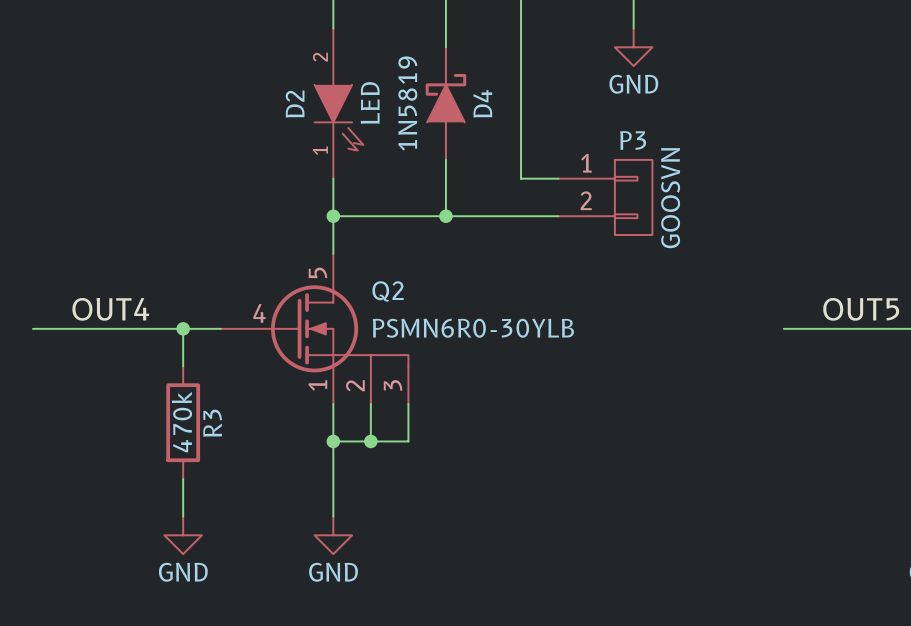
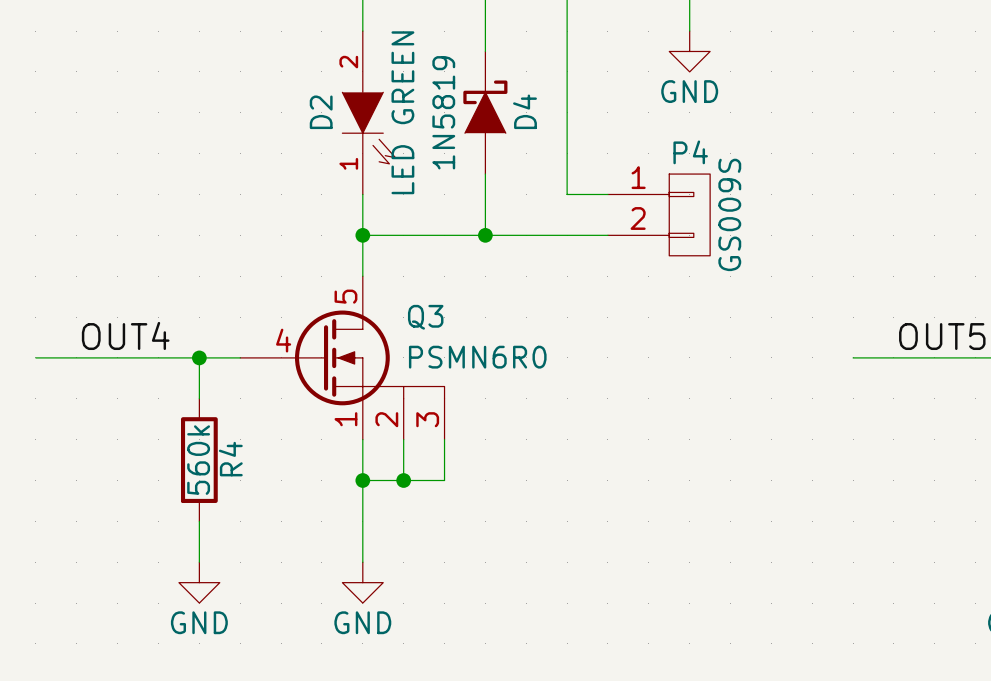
D2 value: LED (370, 102) -> LED GREEN (402, 112)
P3 name: P3 (633, 140) -> P4 (690, 152)
P3 value: GOOSVN (670, 198) -> GS009S (729, 214)
Q2 name: Q2 (388, 291) -> Q3 (425, 317)
Q2 value: PSMN6R0-30YLB (473, 328) -> PSMN6R0 (477, 357)
R3 value: 470k (181, 422) -> 560k (198, 460)
R3 name: R3 (212, 423) -> R4 (230, 459)

